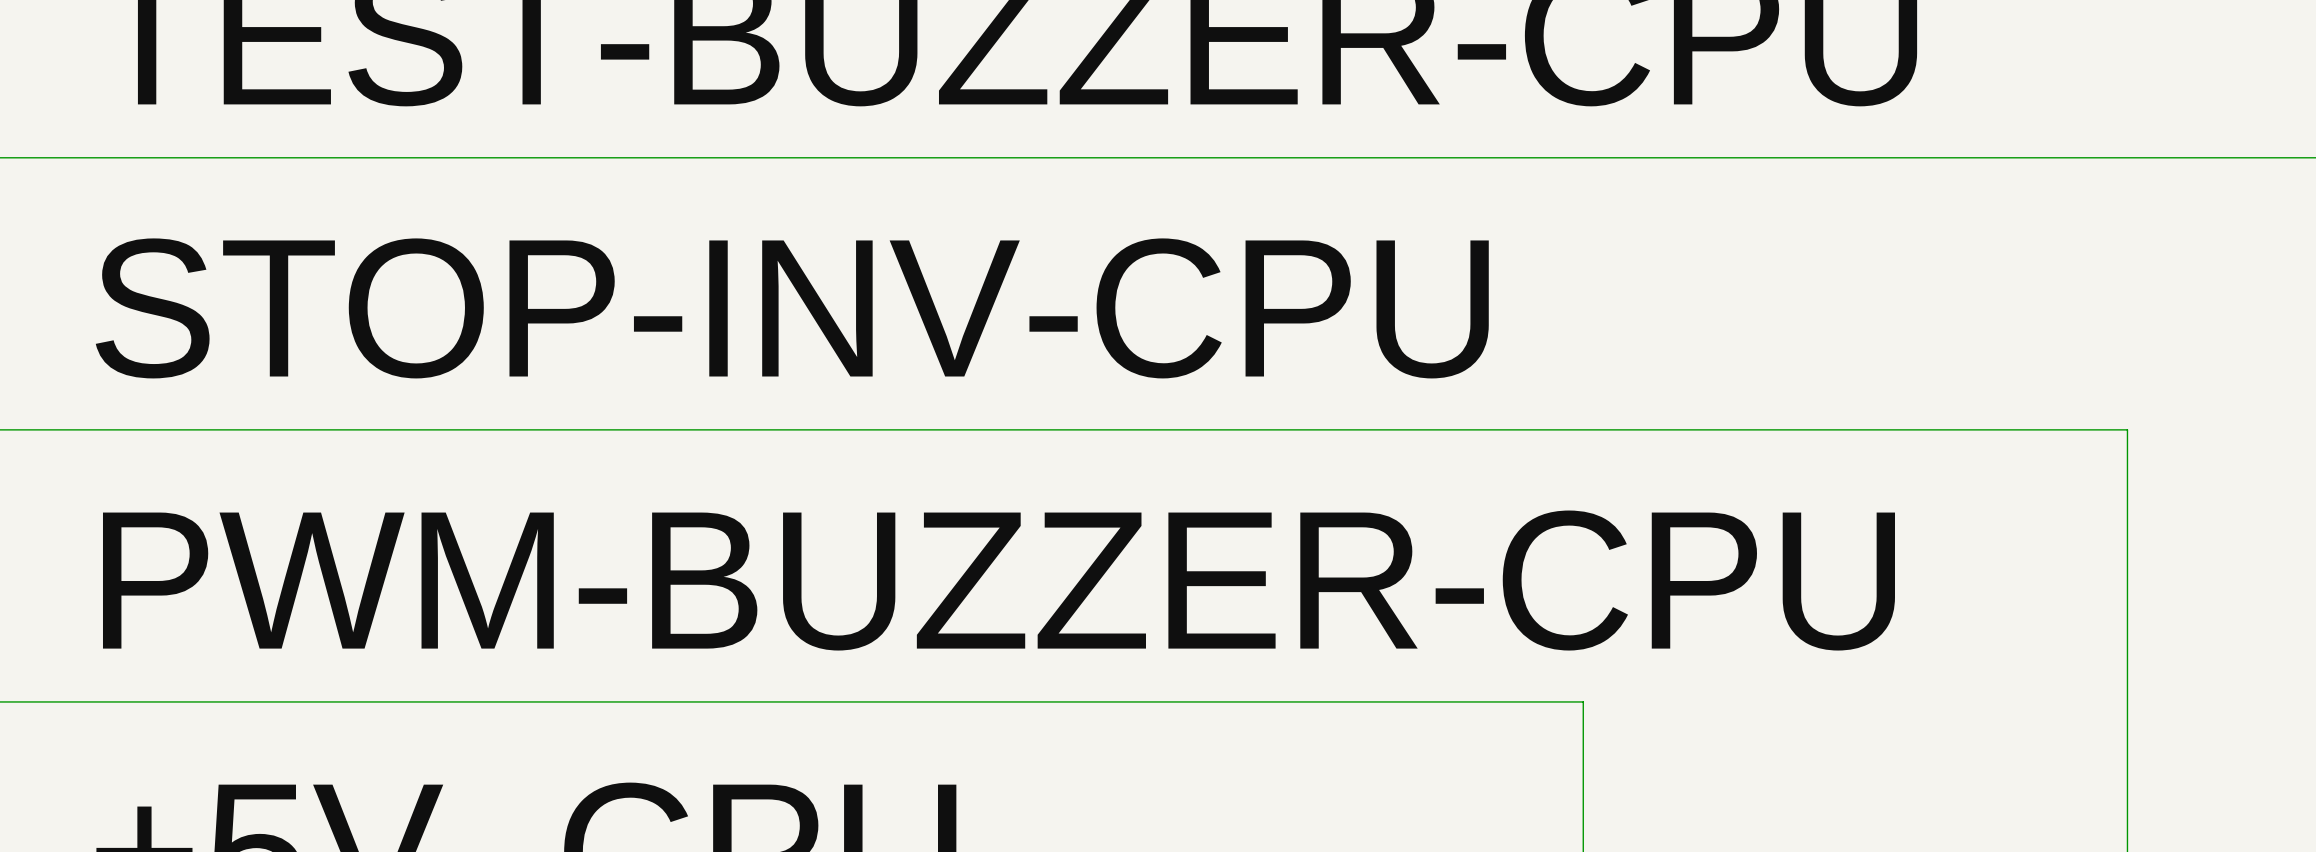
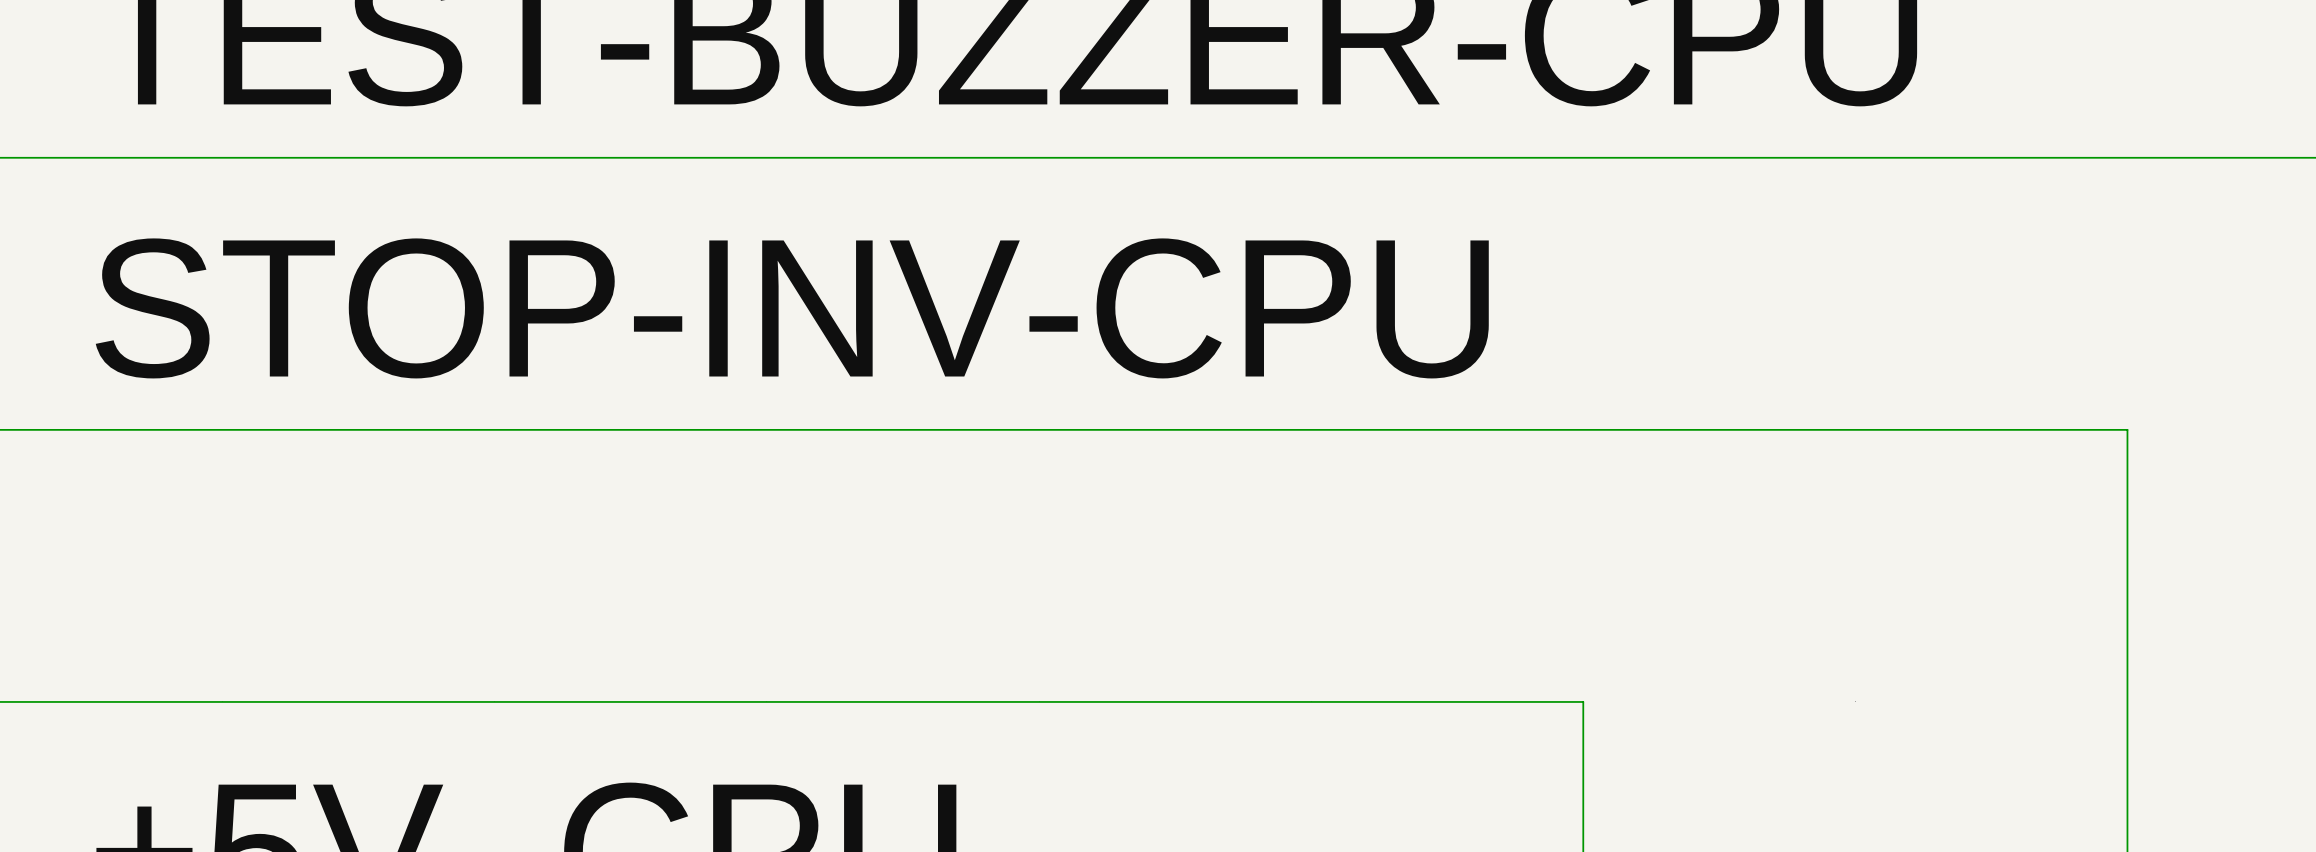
label: PWM-BUZZER-CPU (998, 580) -> none

